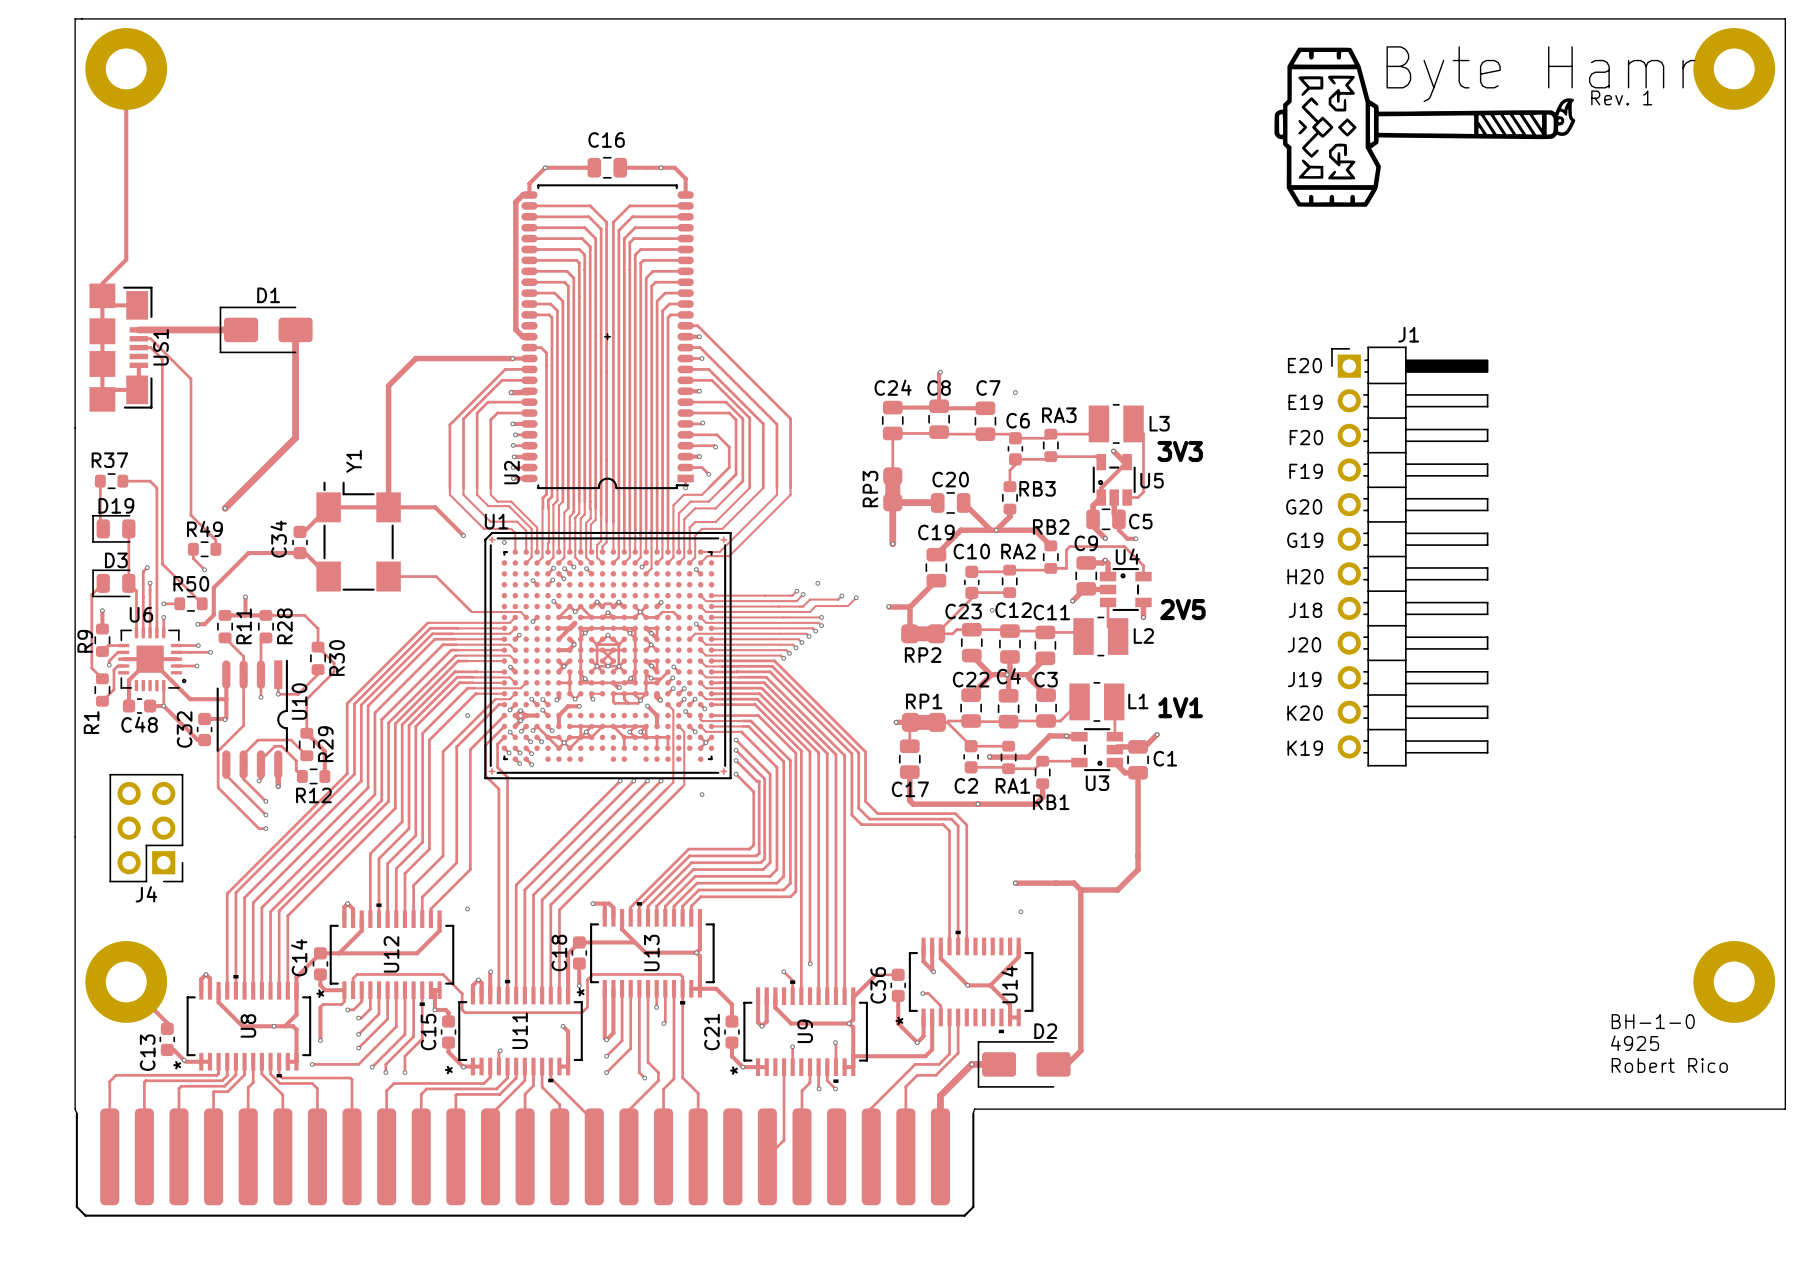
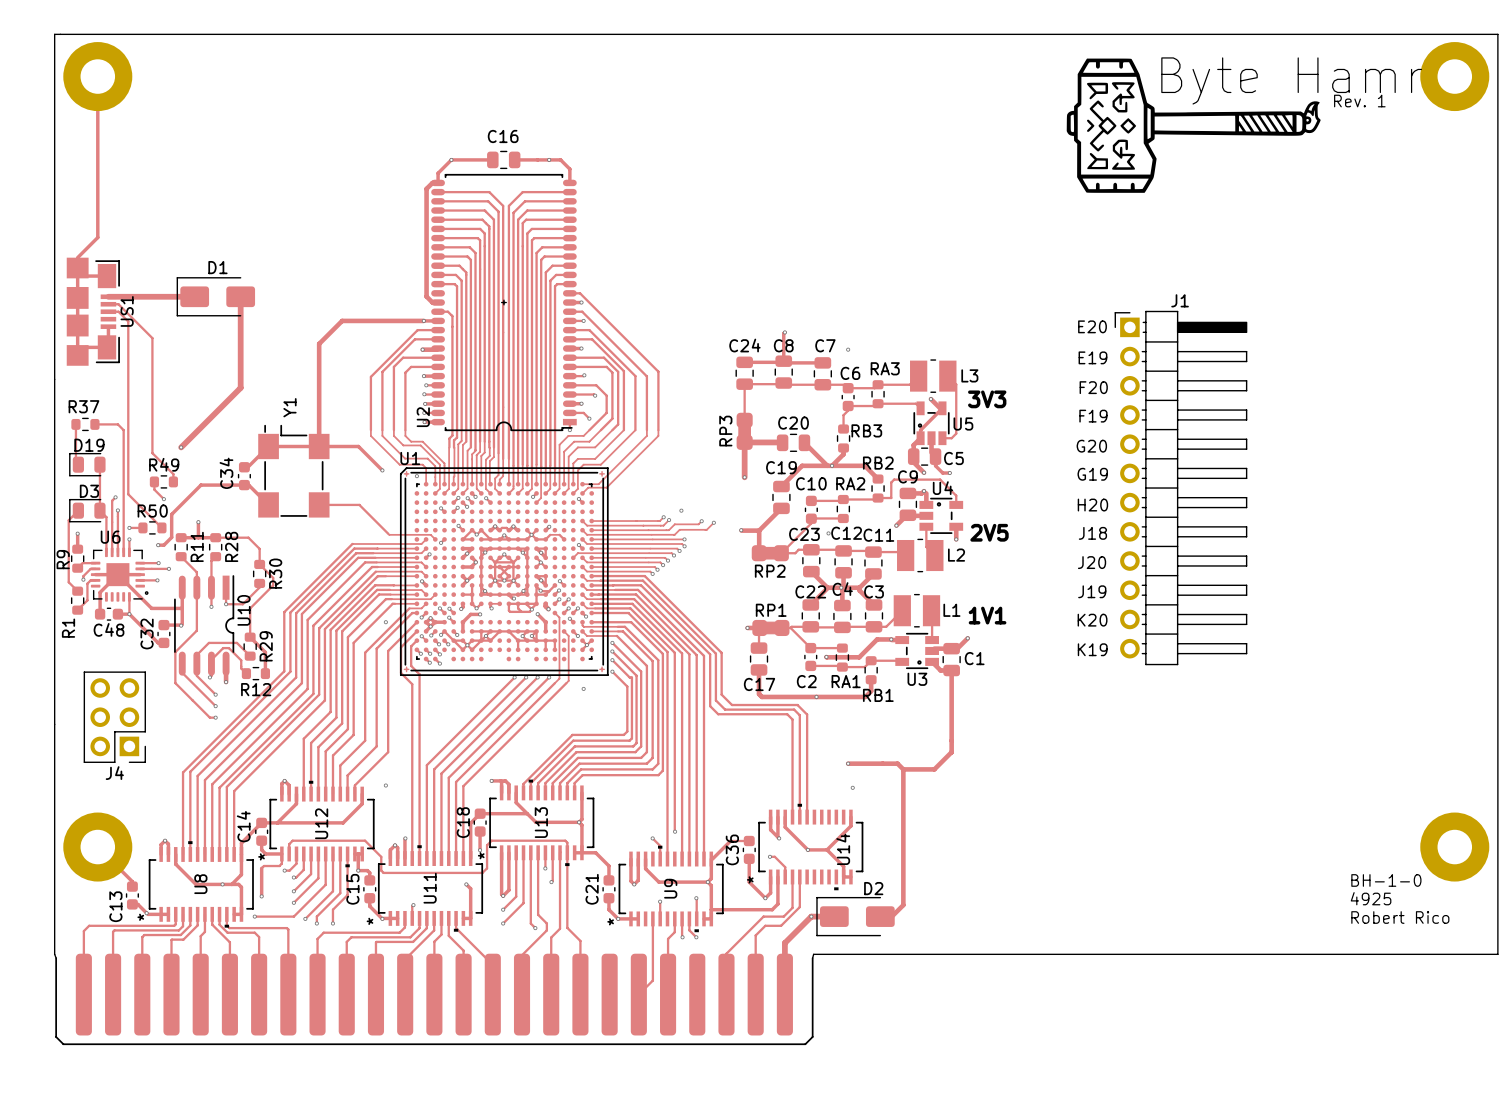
track: (574, 623) (569, 628) -> none
via: none -> (467, 553)

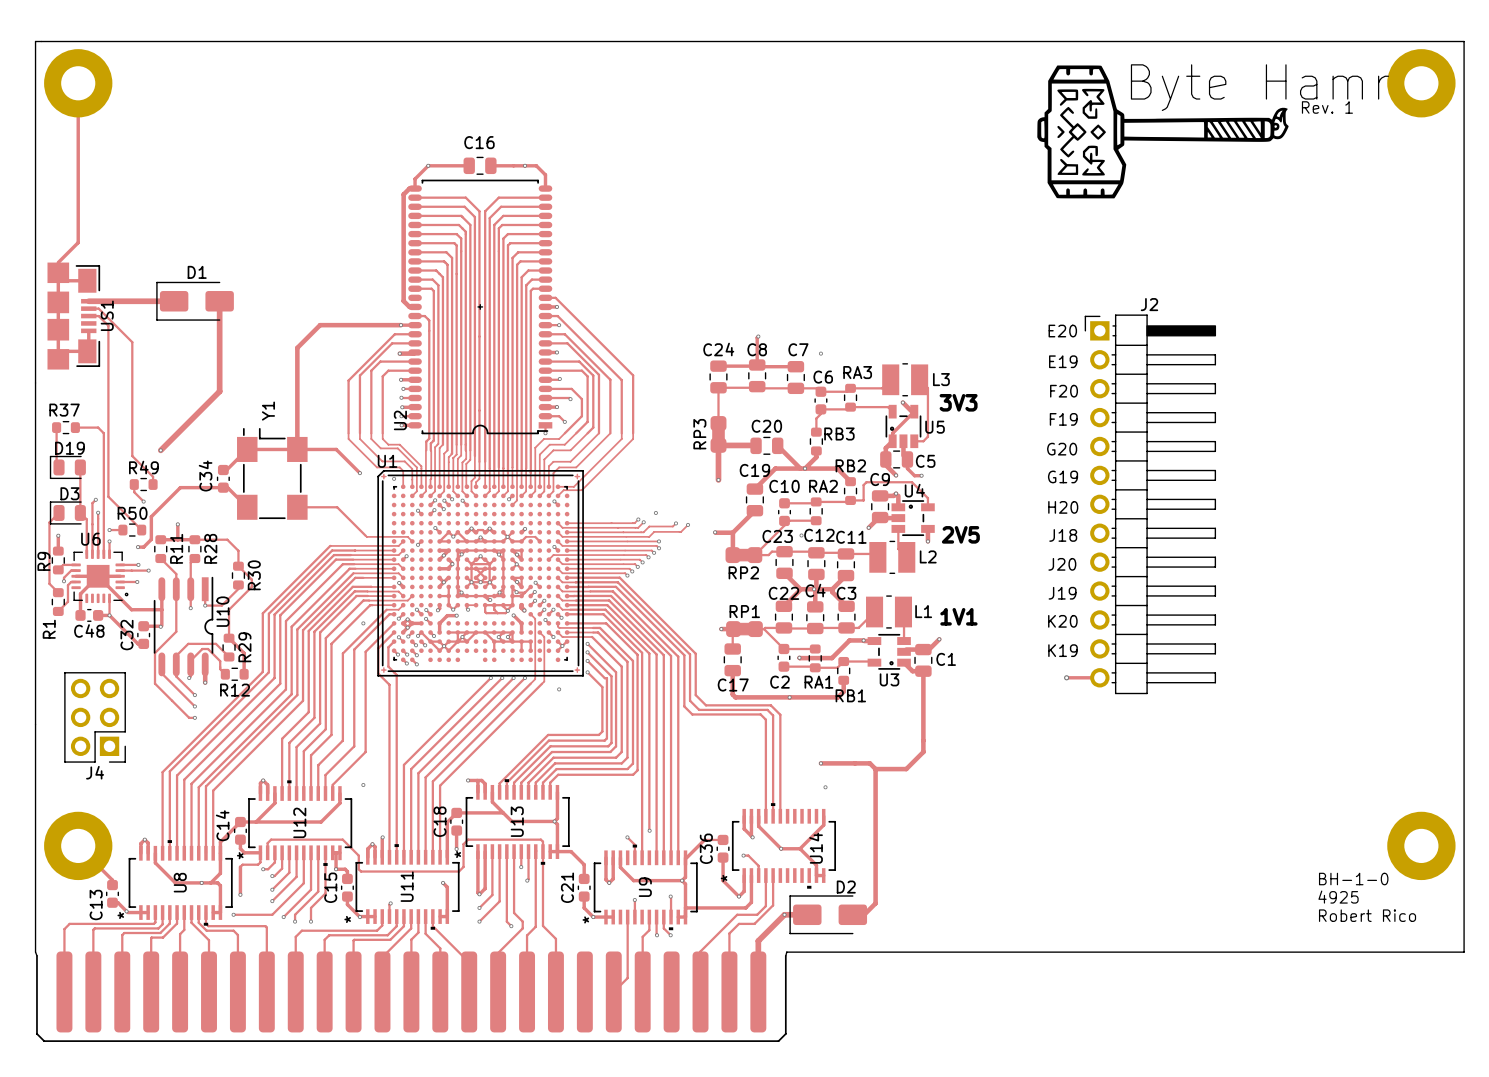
J1: (1180, 488) -> none
J2: none -> (1150, 504)
track: none -> (1066, 677) (1099, 677)
via: none -> (1066, 677)

